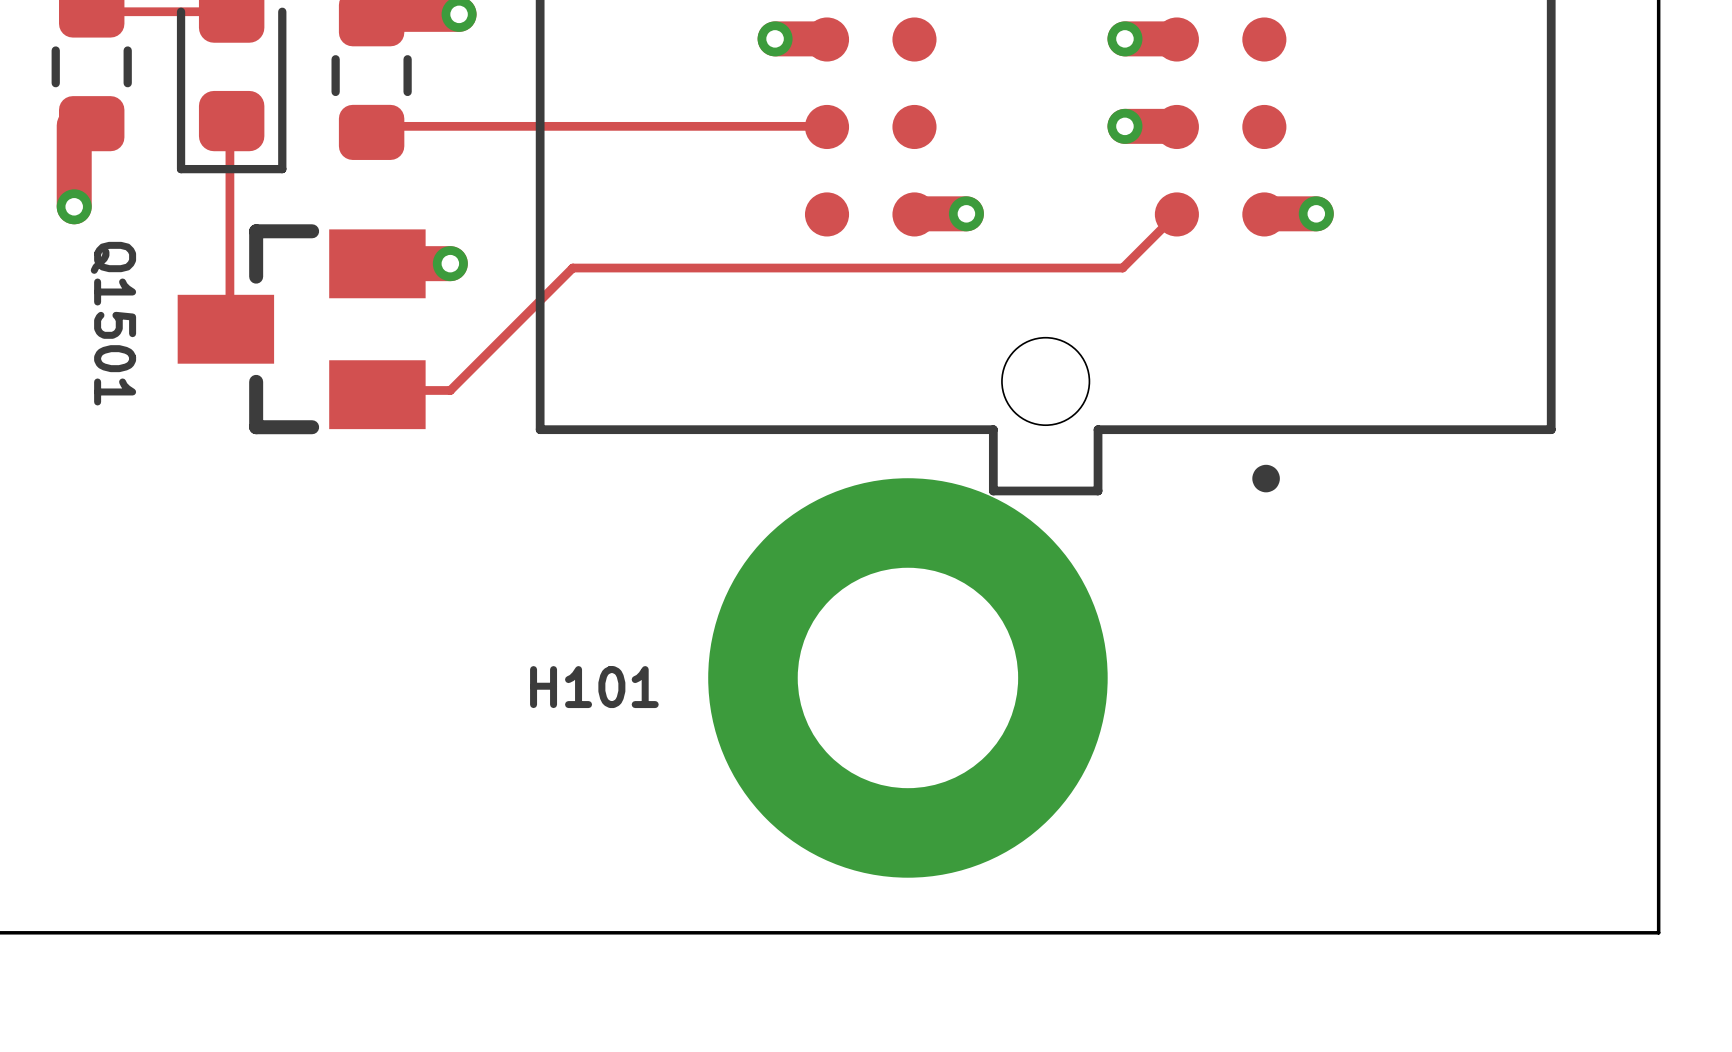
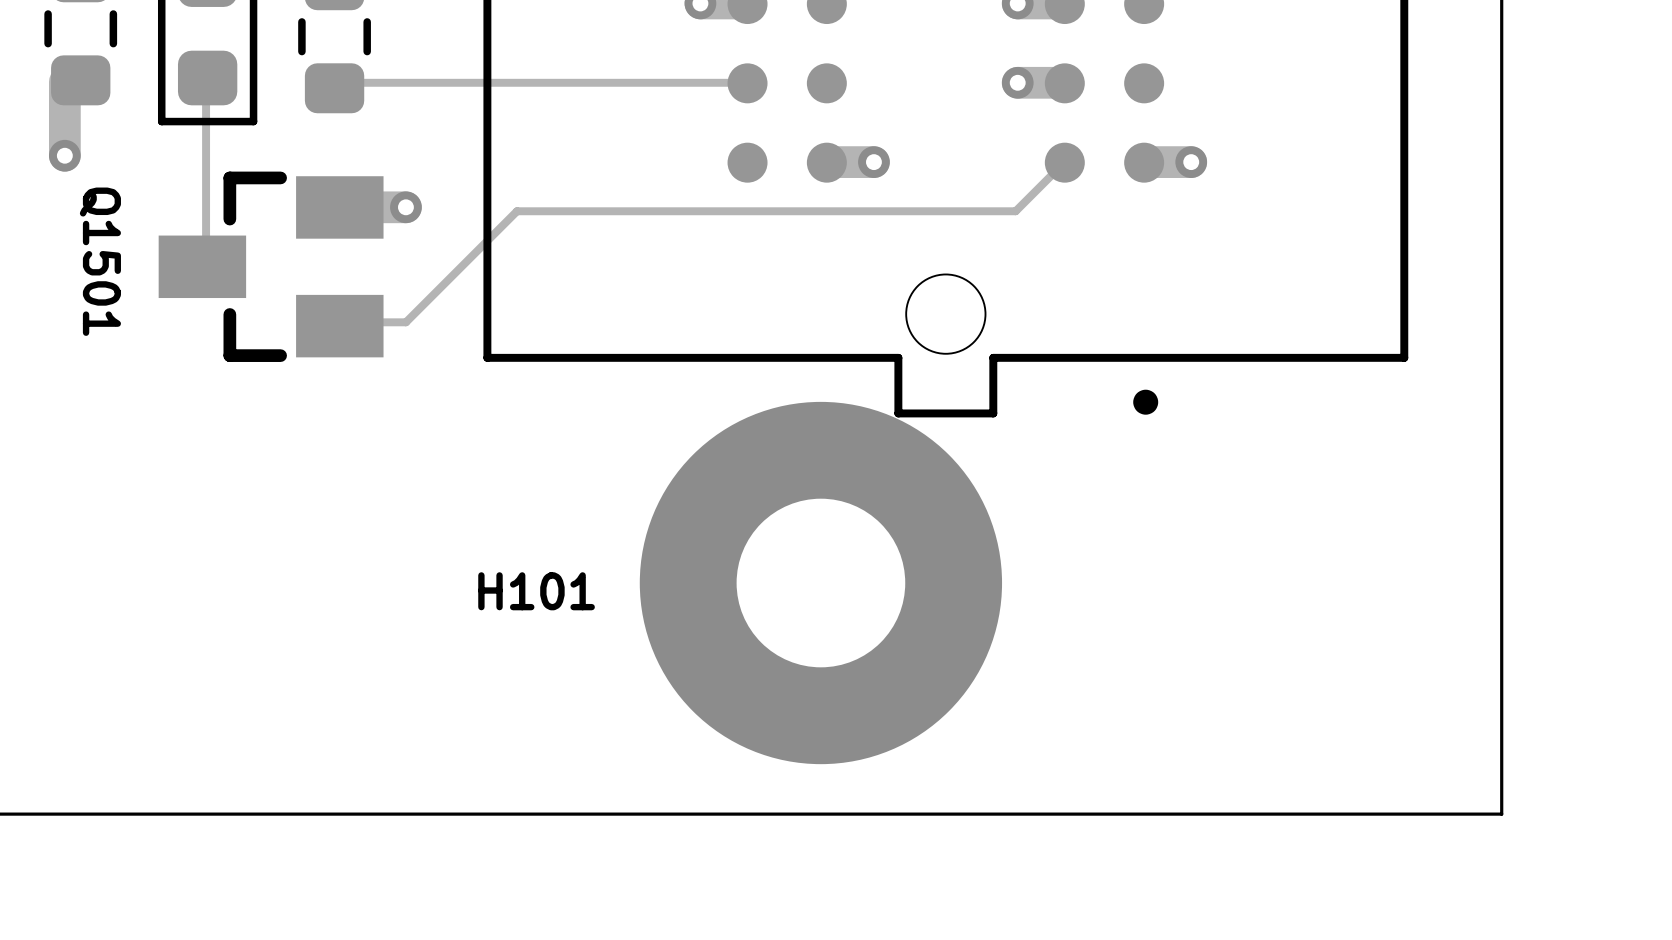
H101 footprint: [708, 478, 1108, 878] -> [639, 401, 1003, 765]

